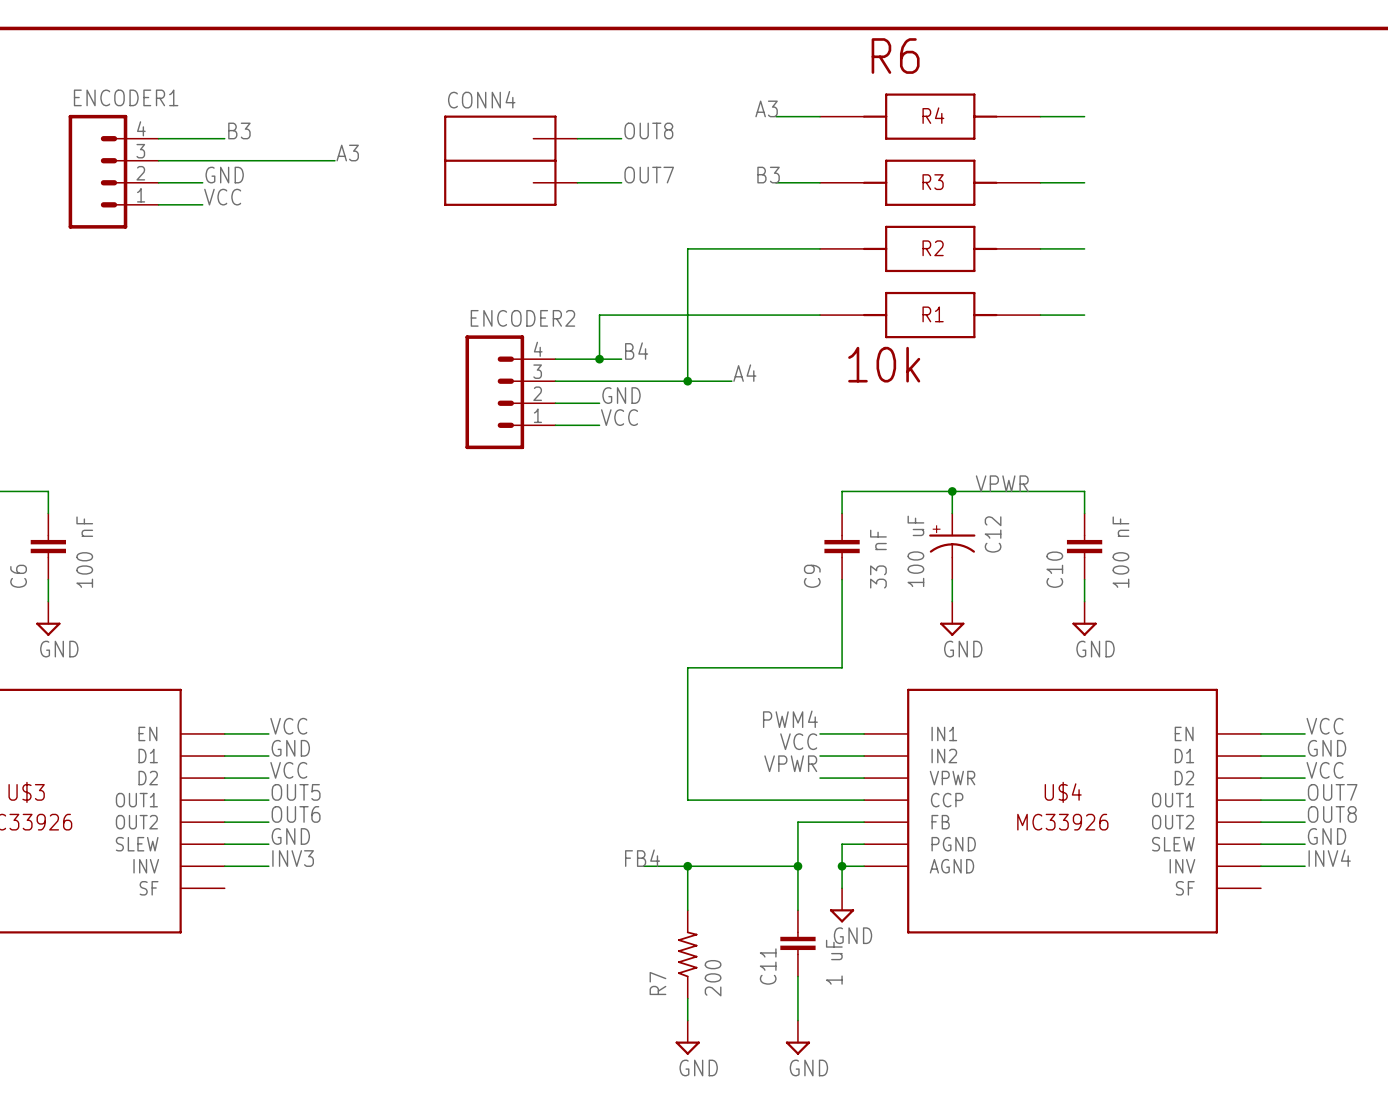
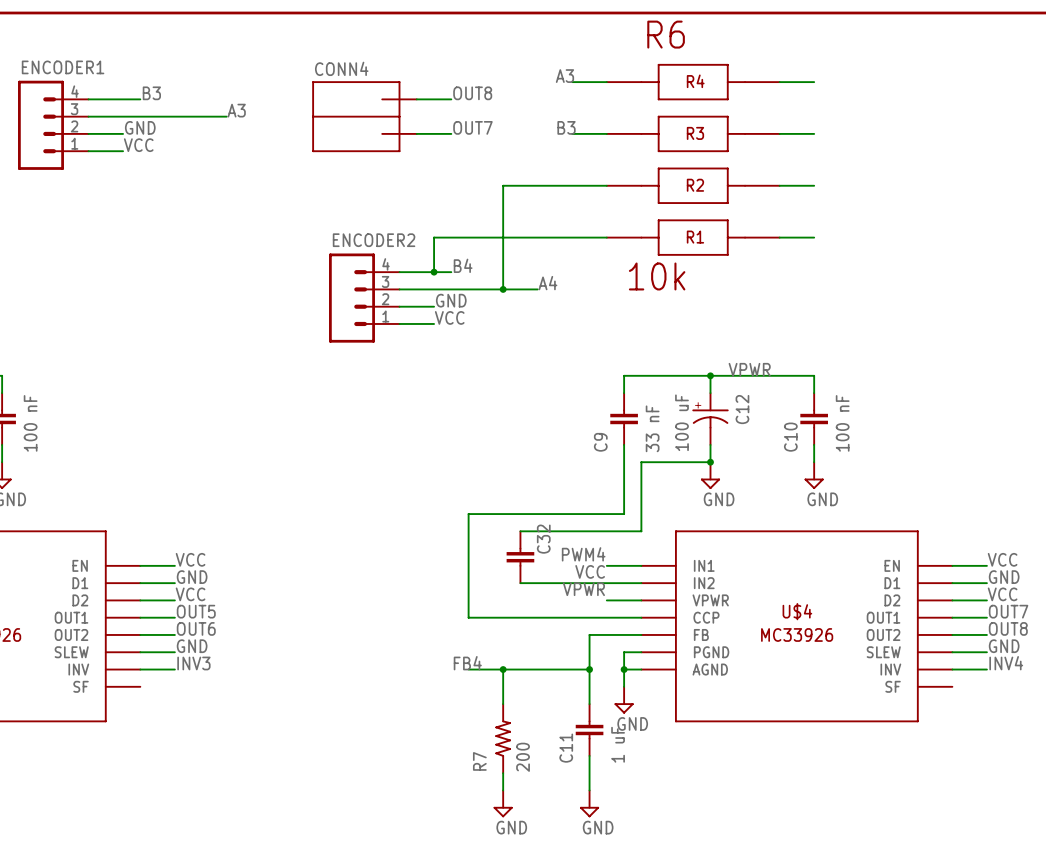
wire: none -> (710, 462) (641, 462) (641, 531) (520, 531)
junction: none -> (710, 462)
wire: (687, 667) (687, 800) -> (503, 514) (468, 514) (468, 617) (503, 617)
C32: none -> (520, 557)
wire: none -> (520, 583) (606, 583)

